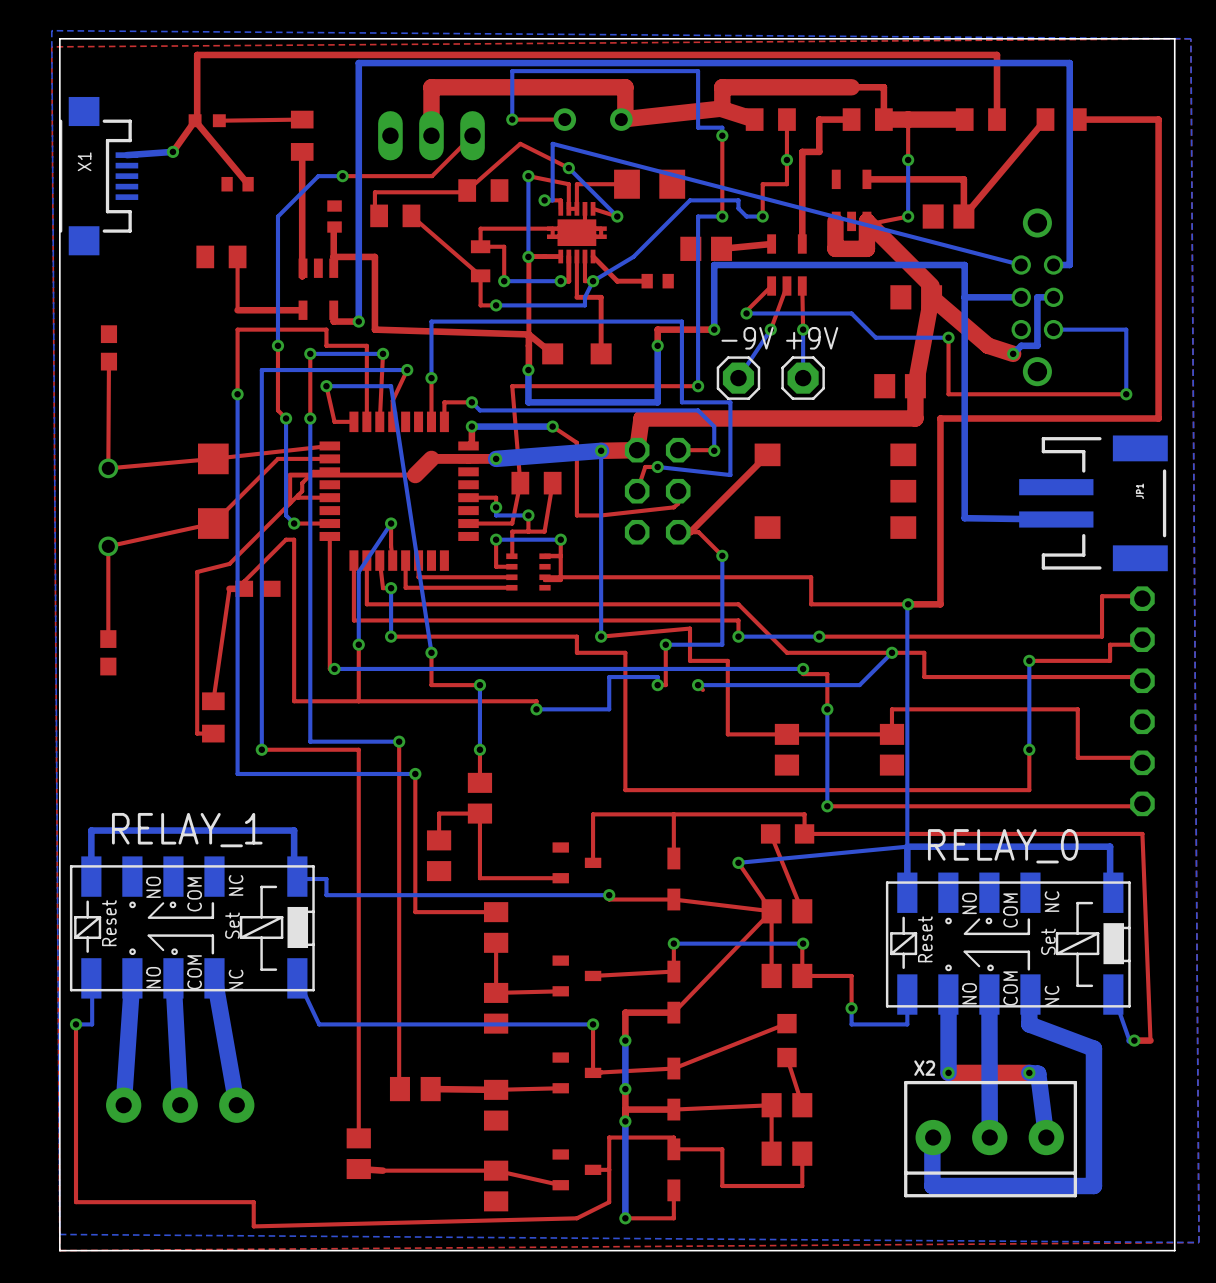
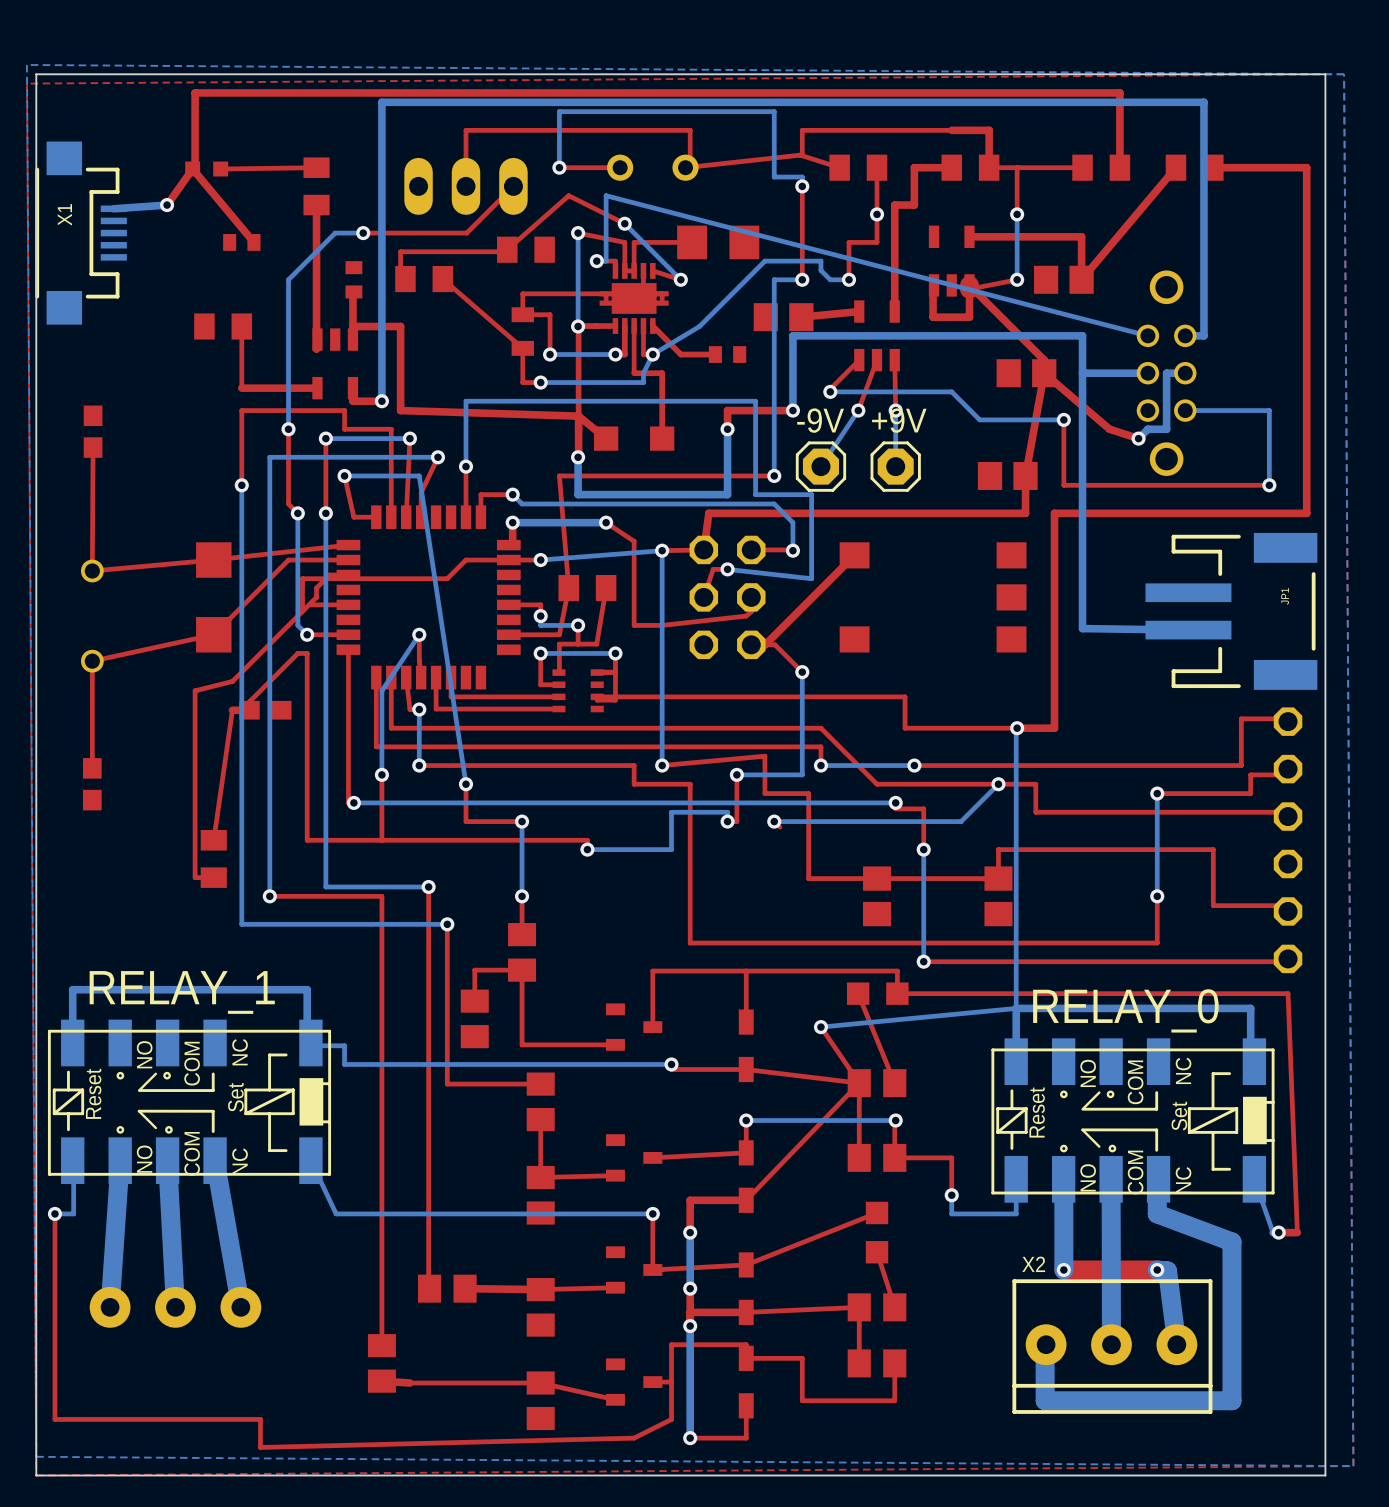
top track width: thick (851, 87) (722, 87) (722, 108) -> thin (951, 130) (802, 130) (802, 155)
top track width: thick (625, 119) (625, 87) (431, 87) (431, 135) -> thin (690, 167) (690, 130) (466, 130) (466, 186)
top track width: thick (754, 119) (720, 108) (621, 119) -> thin (839, 167) (800, 155) (685, 167)
top track width: thick (964, 119) (883, 119) -> thin (1082, 167) (989, 167)
top track width: thick (835, 221) (835, 248) (866, 248) (866, 224) -> thin (933, 285) (933, 317) (969, 317) (969, 289)
top track width: thick (866, 221) (931, 286) -> thin (969, 285) (1044, 360)
top track width: thick (1013, 353) (988, 345) (931, 297) (915, 386) (915, 418) (641, 418) (637, 450) (601, 450) -> thin (1138, 438) (1109, 429) (1044, 373) (1025, 475) (1025, 513) (708, 513) (703, 549) (662, 550)
bottom track width: thick (601, 450) (496, 458) -> thin (662, 550) (540, 560)
top track width: thick (496, 458) (431, 458) (415, 475) (290, 475) -> thin (540, 560) (466, 560) (447, 578) (302, 578)

